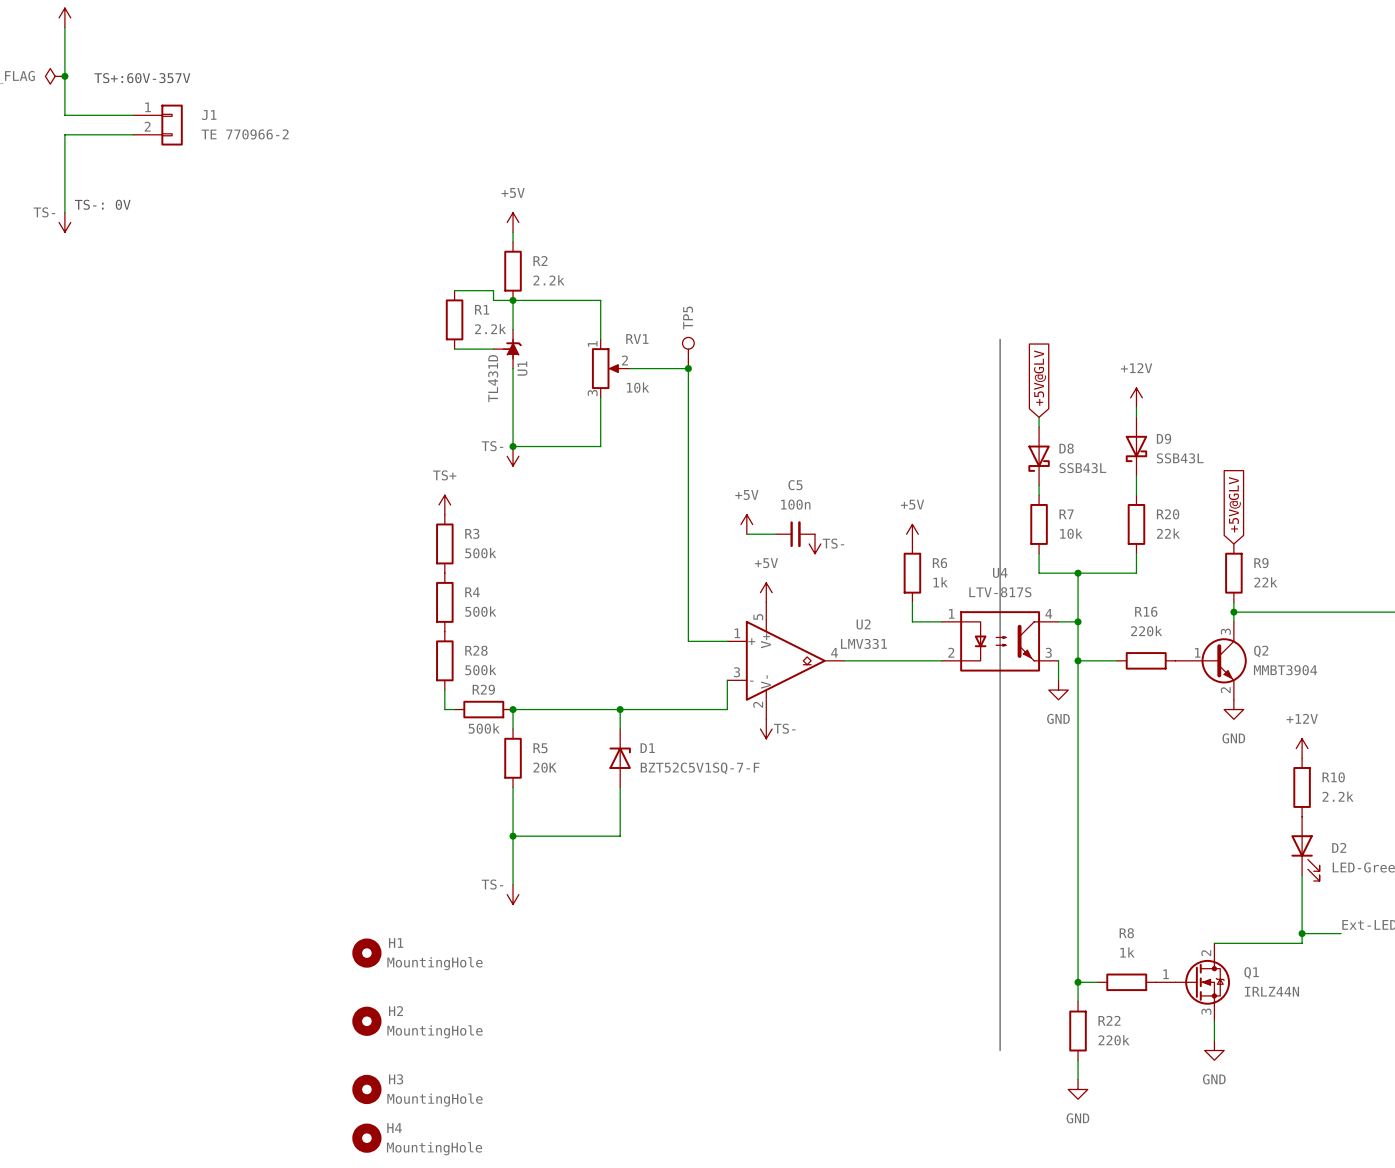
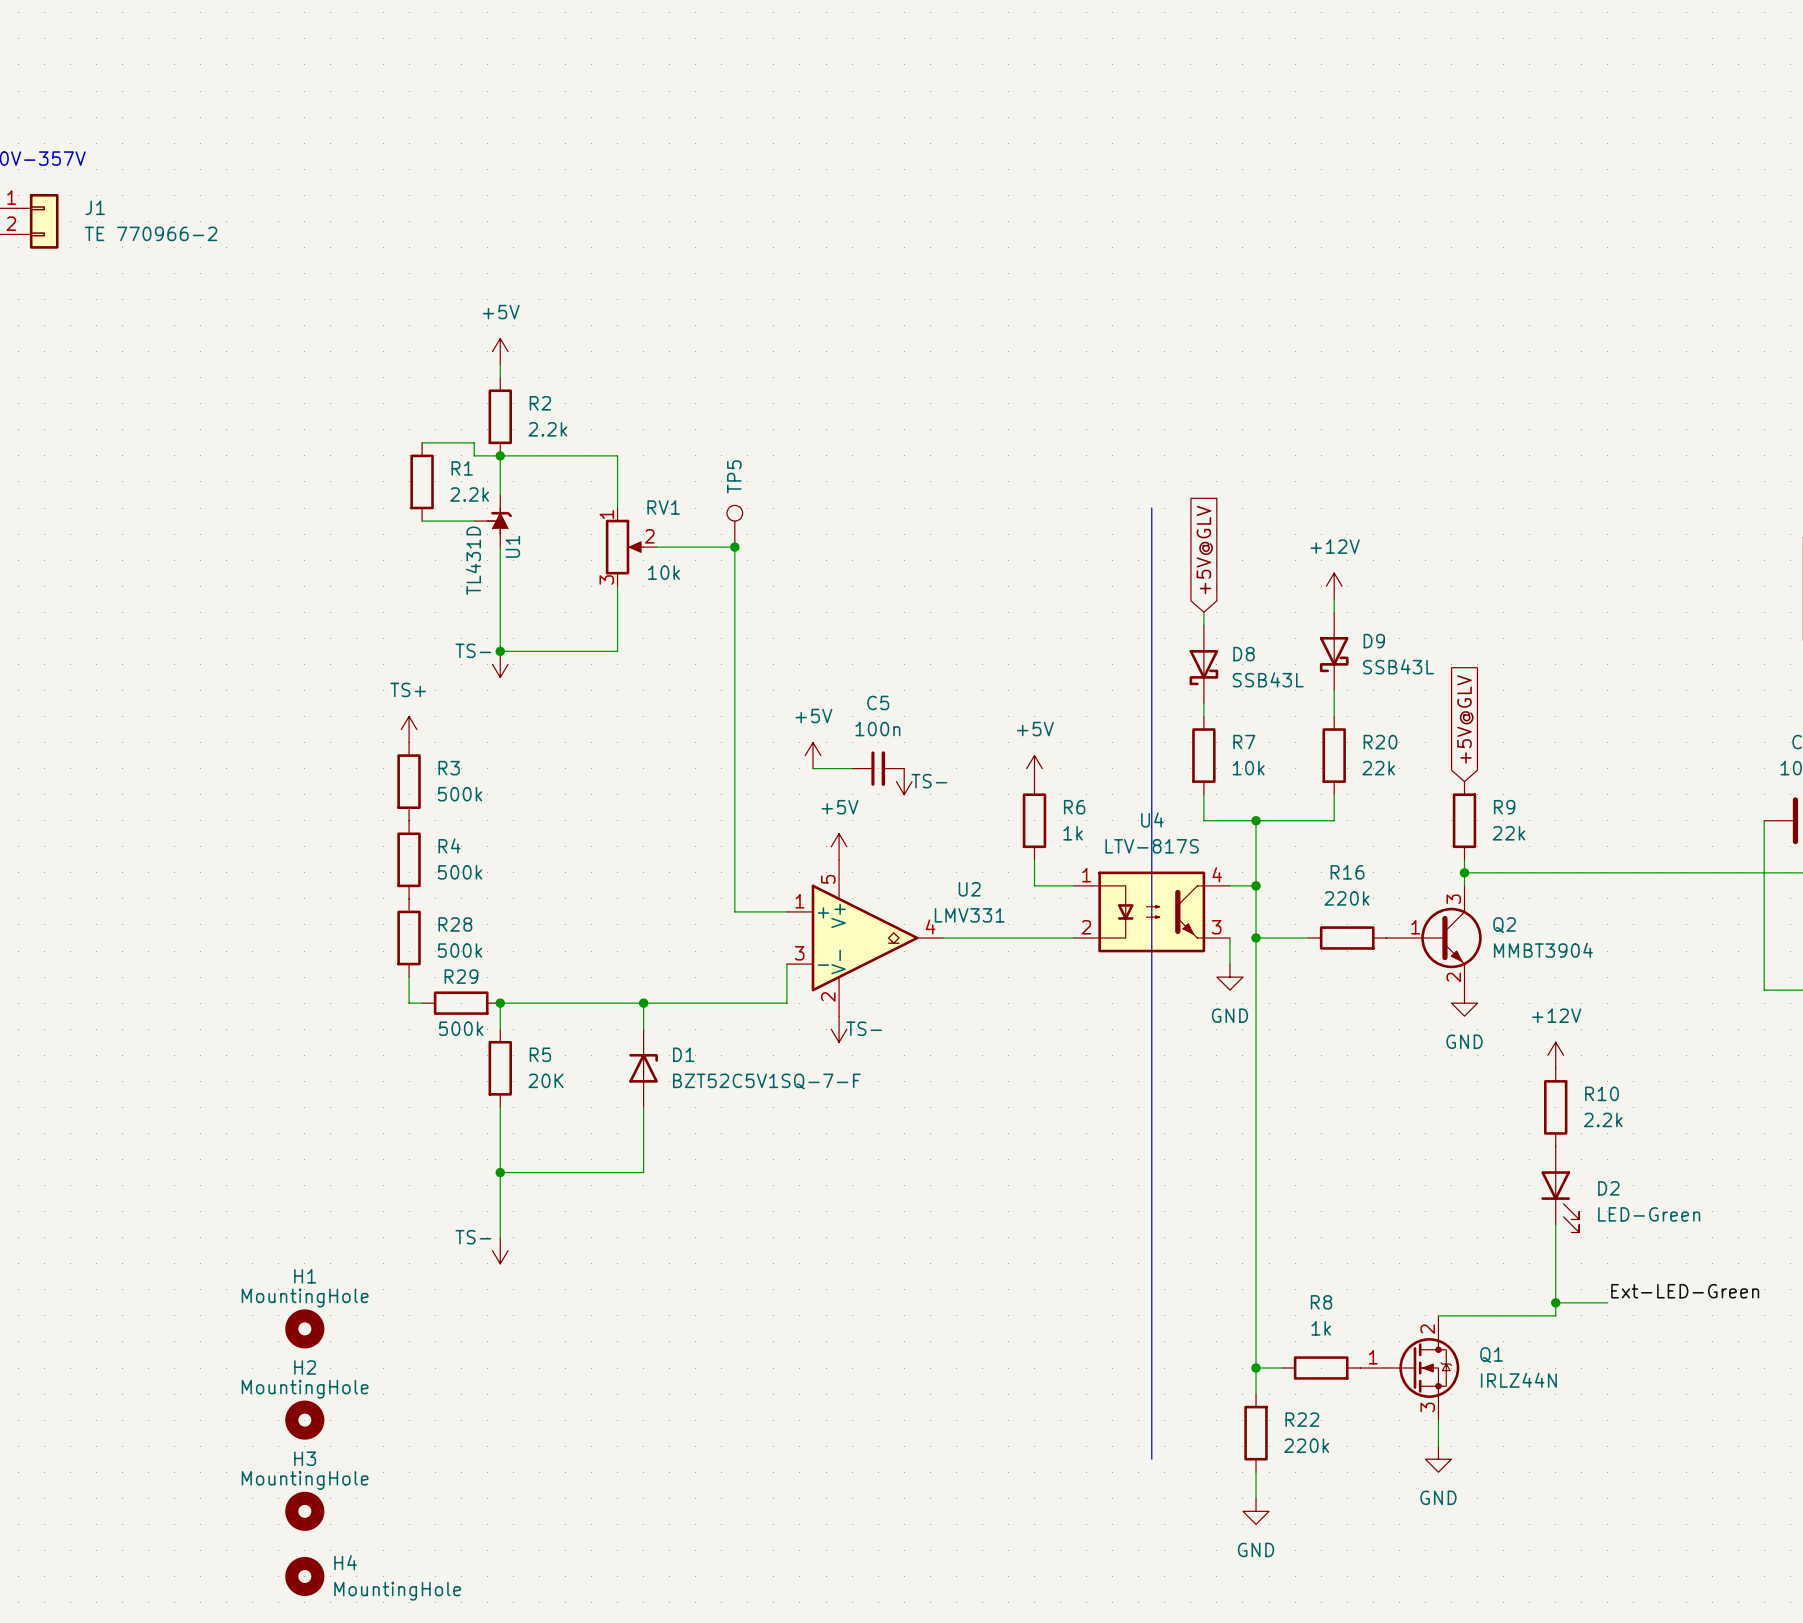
H1 name position: H1 (396, 942) -> H1 (305, 1276)
H1 value position: MountingHole (434, 963) -> MountingHole (305, 1298)
H2 name position: H2 (396, 1011) -> H2 (305, 1367)
H2 value position: MountingHole (434, 1031) -> MountingHole (305, 1389)
H3 name position: H3 (396, 1079) -> H3 (305, 1458)
H3 value position: MountingHole (434, 1100) -> MountingHole (305, 1480)

